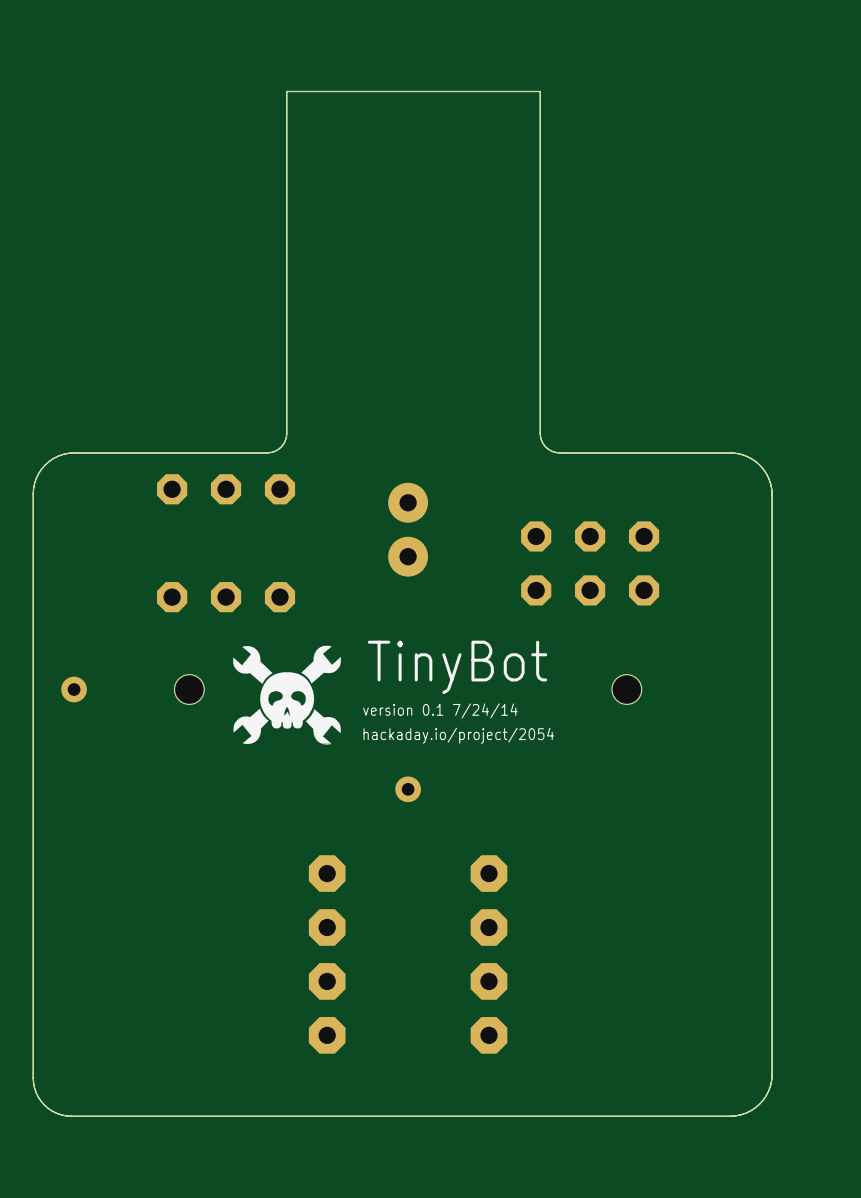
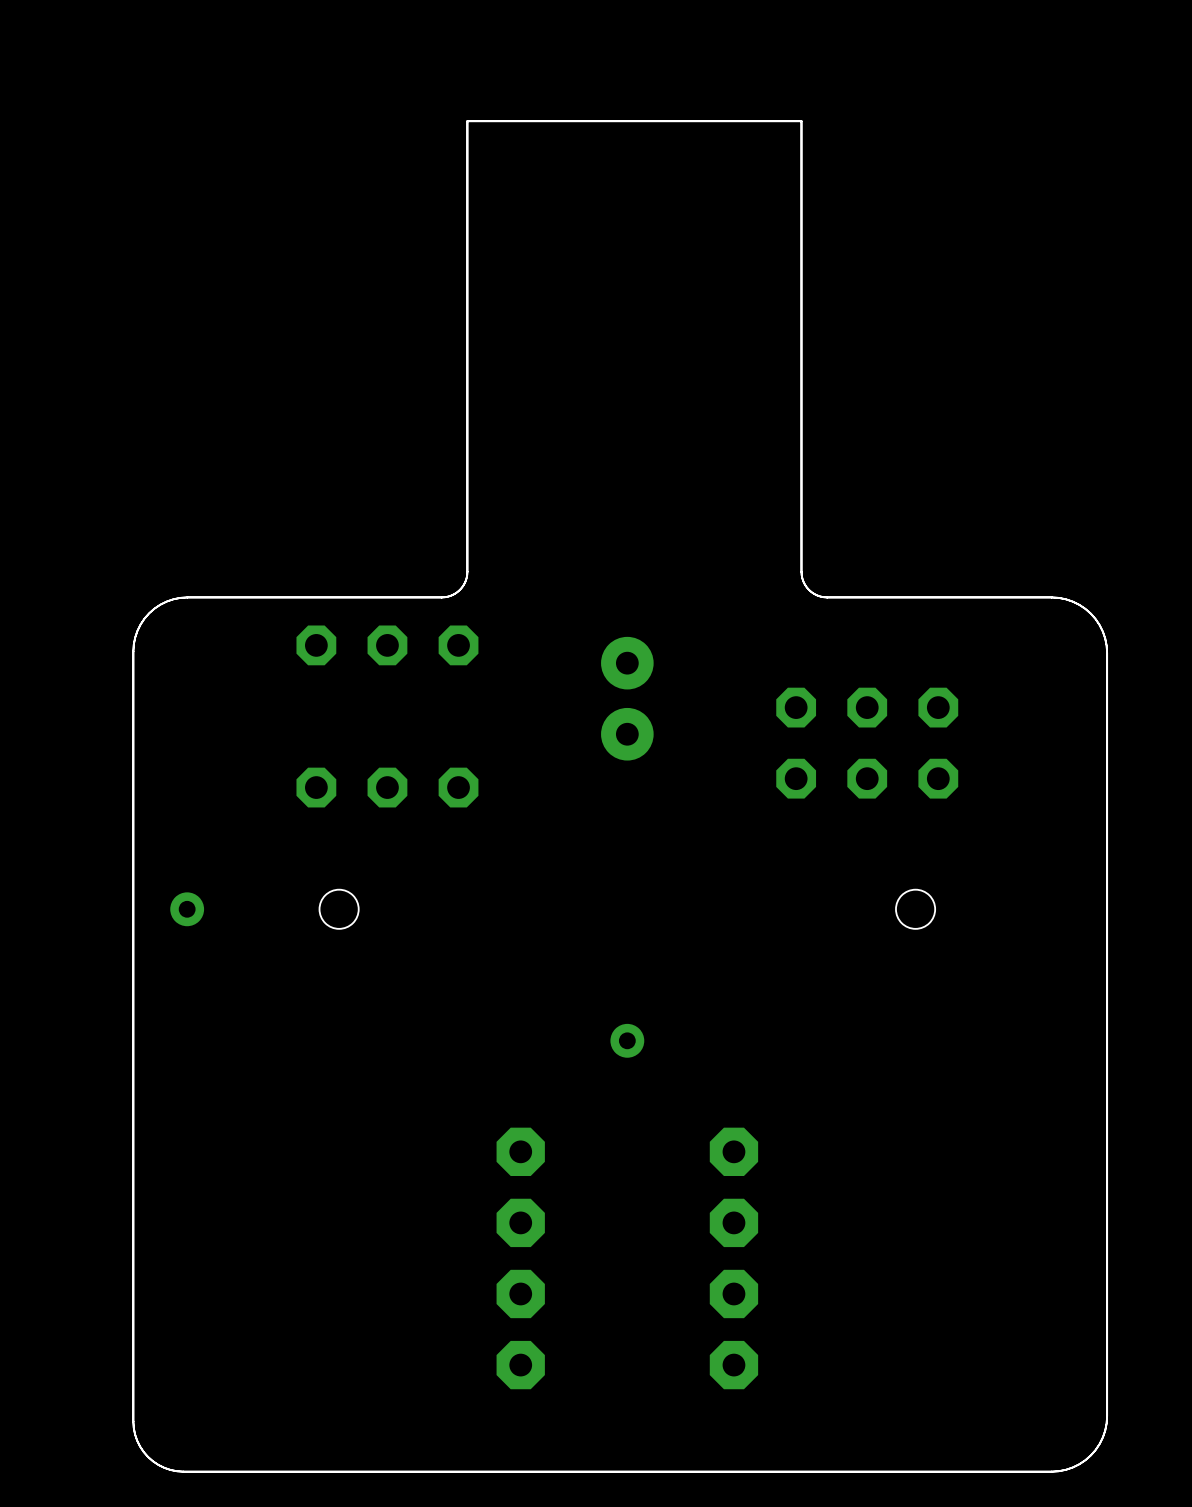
drawing: [233, 645, 341, 745] -> none
text: TinyBot (457, 667) -> none
text: version 0.1 7/24/14 (440, 710) -> none
text: hackaday.io/project/2054 (458, 735) -> none

